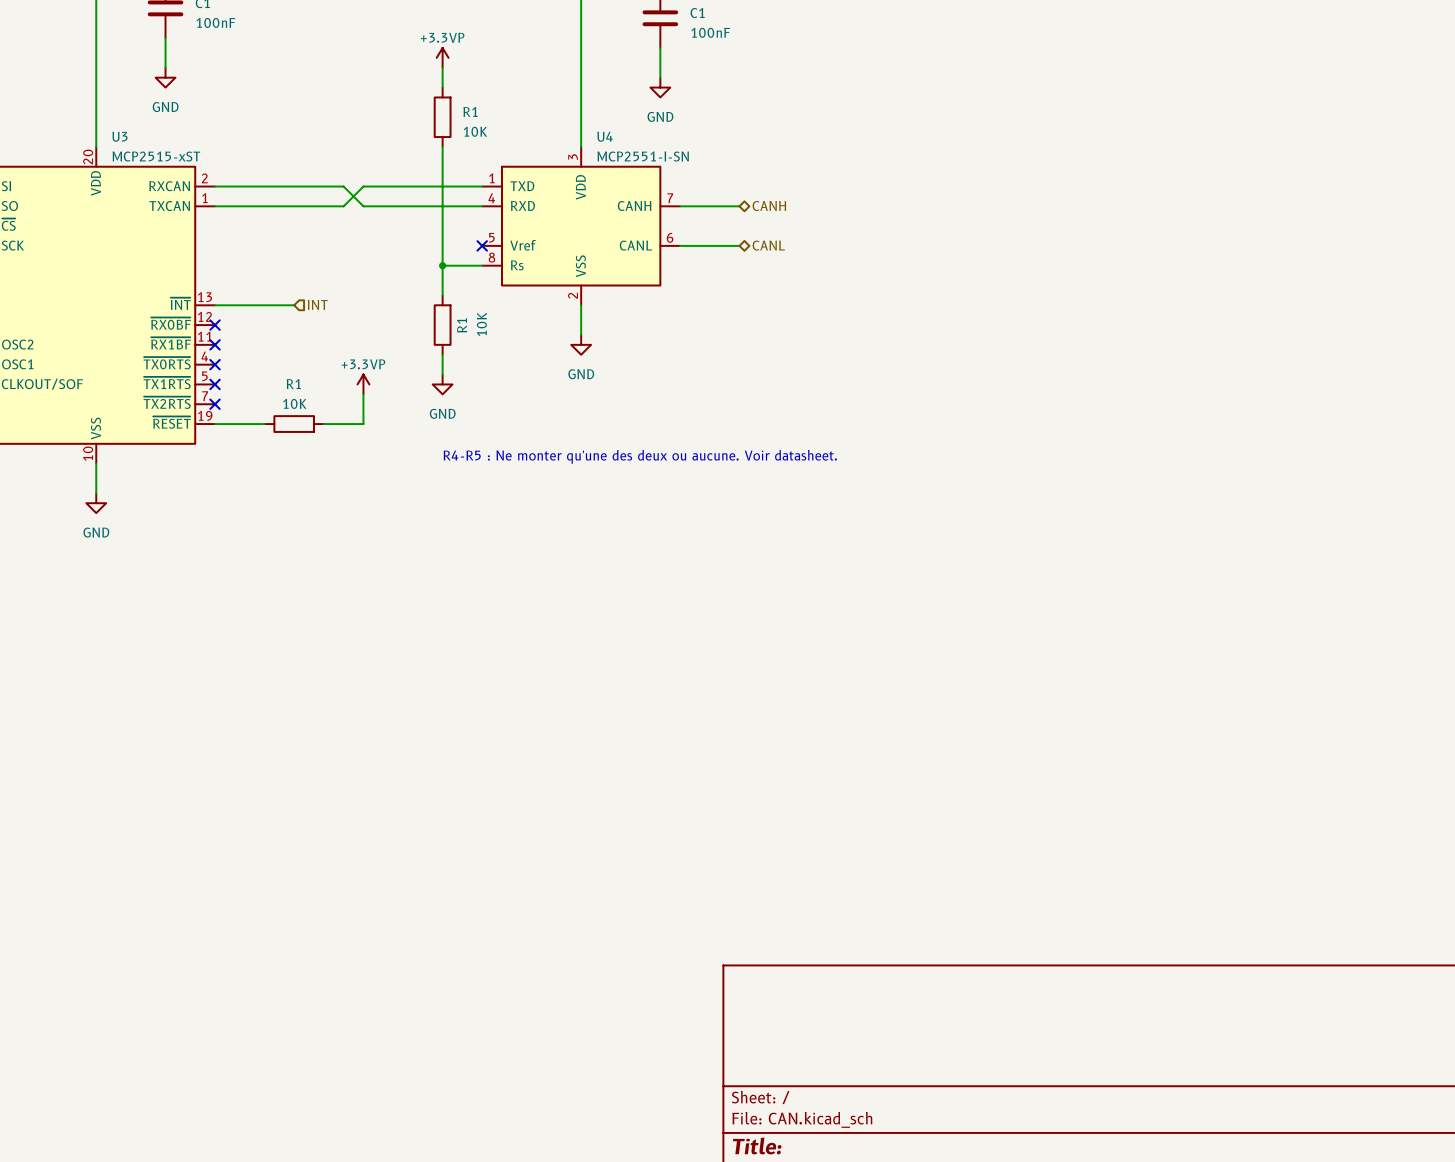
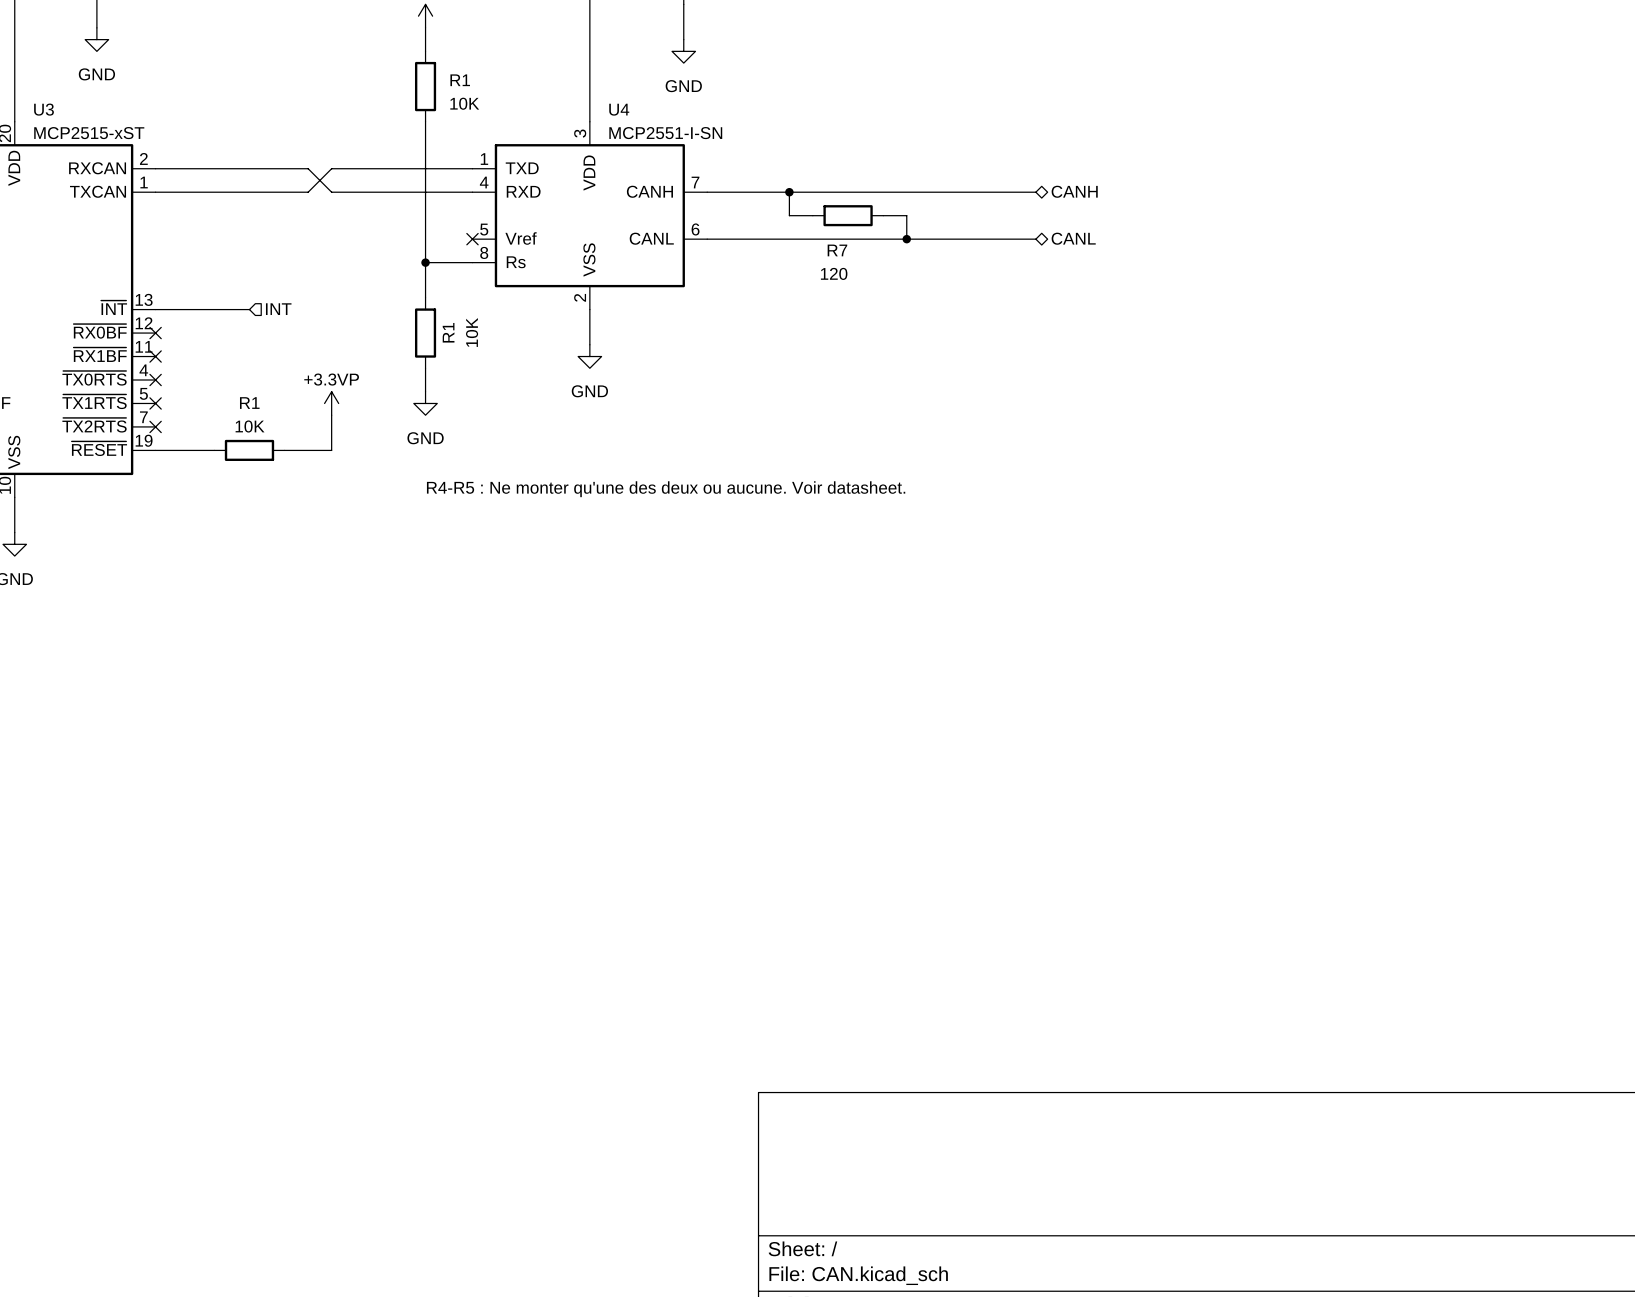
wire: none -> (777, 192) (1035, 192)
wire: none -> (789, 192) (789, 215) (812, 215)
junction: none -> (789, 192)
hierarchical label: CANH (769, 206) -> none
hierarchical label: none -> CANH (1074, 191)
R7: none -> 120 (848, 215)
wire: none -> (883, 215) (906, 215) (906, 239)
wire: none -> (777, 239) (1035, 239)
hierarchical label: CANL (768, 245) -> none
junction: none -> (906, 239)
hierarchical label: none -> CANL (1073, 238)

